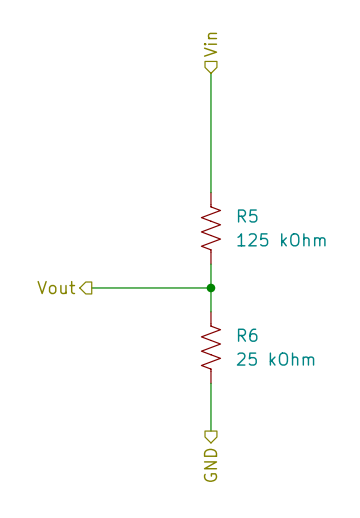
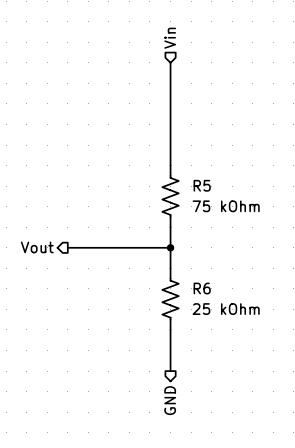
R5 value: 125 kOhm (281, 239) -> 75 kOhm (226, 206)

